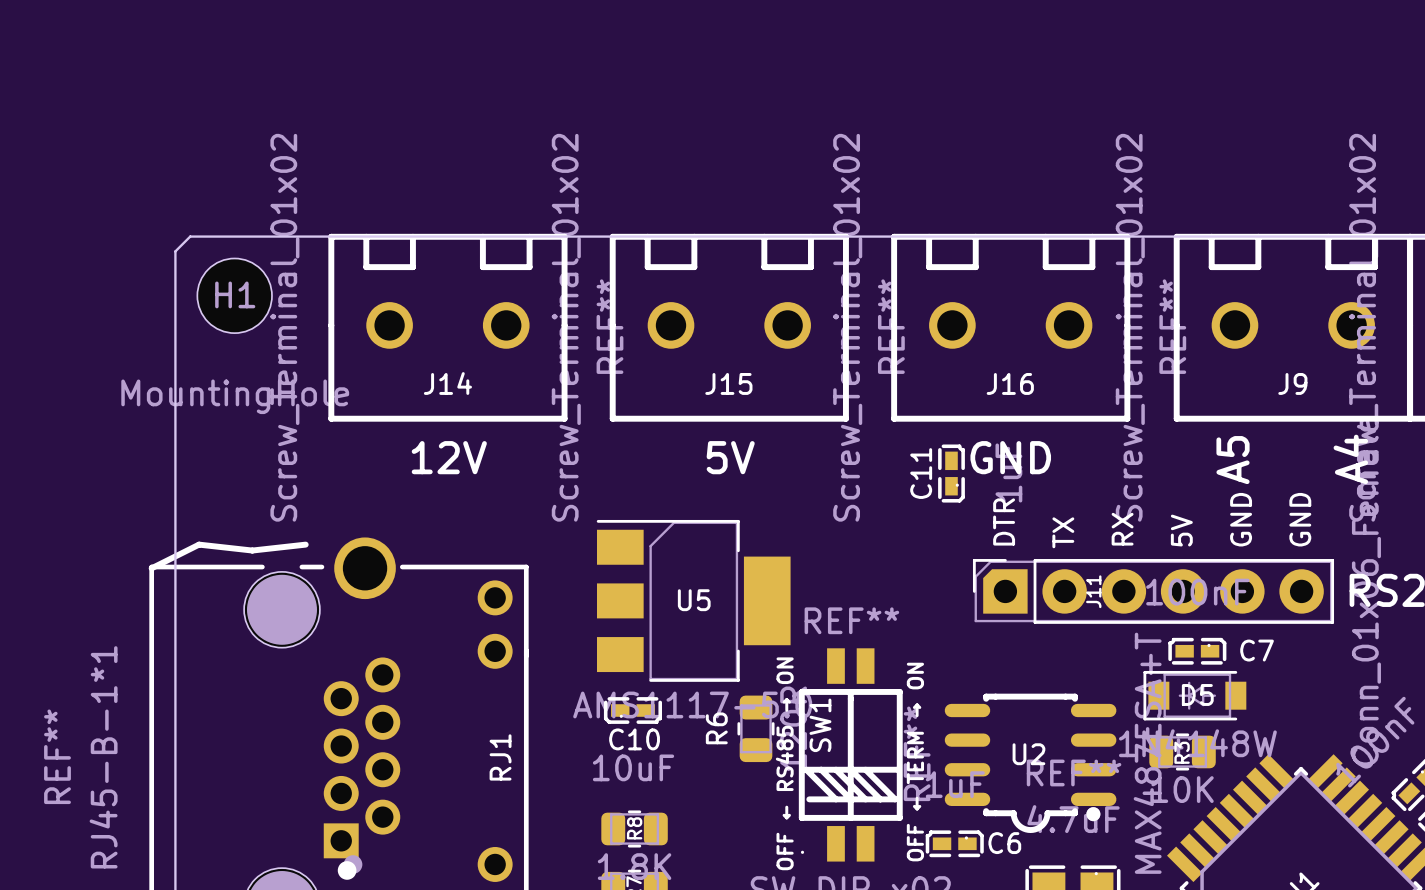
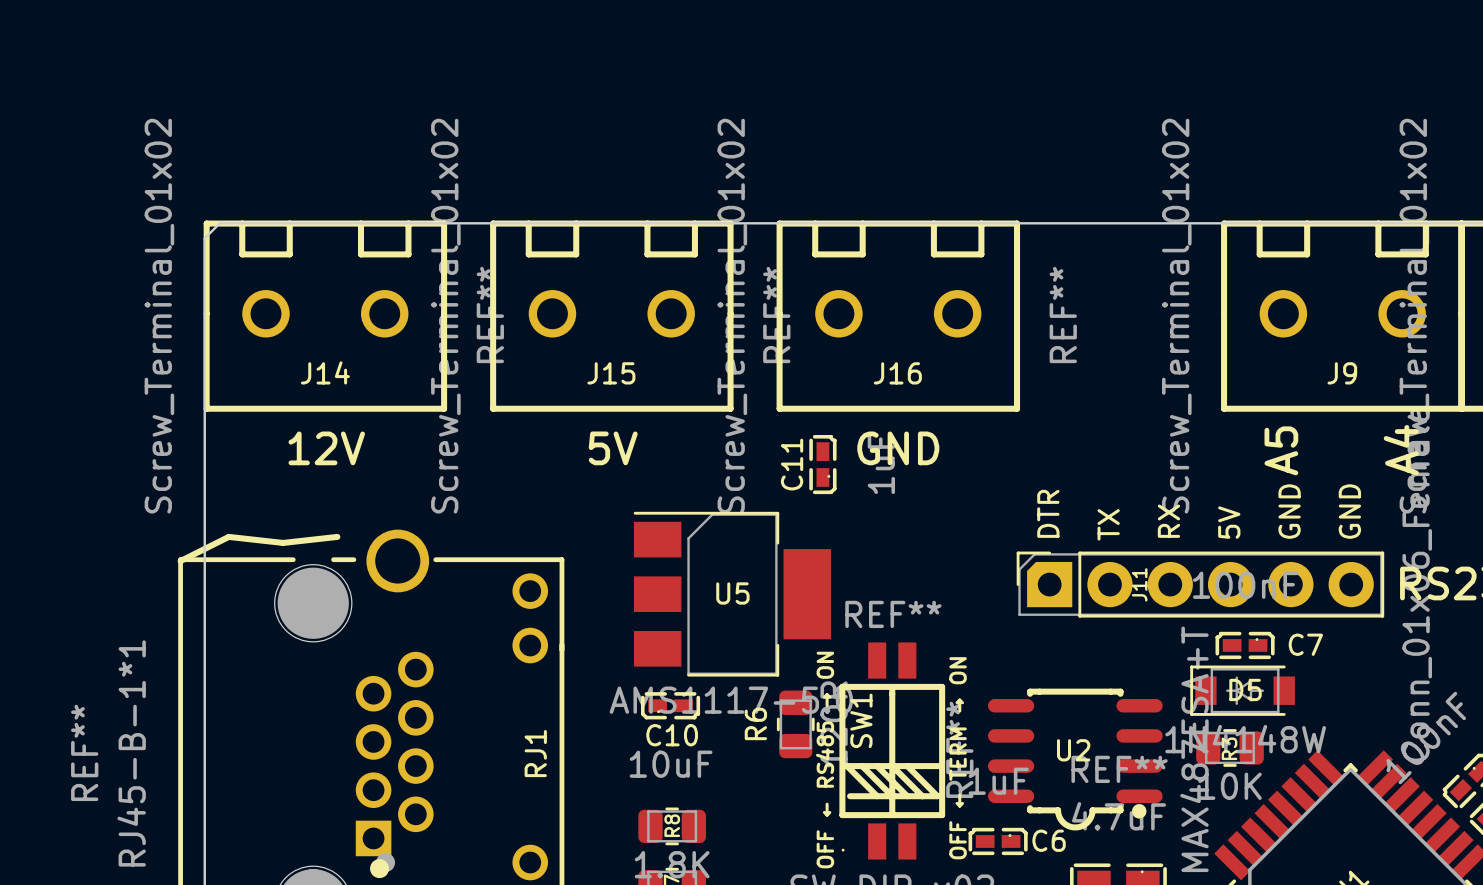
H1: MountingHole (234, 295) -> none
J14 position: (447, 327) -> (325, 316)
J15 position: (729, 327) -> (611, 316)
J16 position: (1010, 327) -> (898, 316)
C11 position: (951, 473) -> (822, 464)

